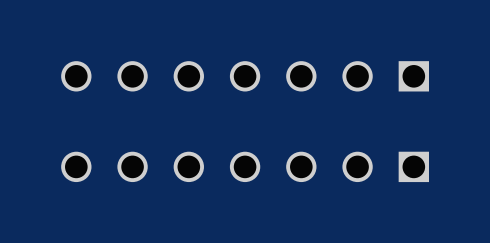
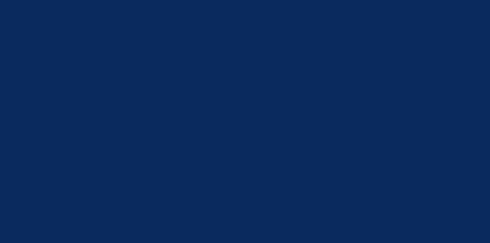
part: (245, 76) -> none
part: (245, 166) -> none

